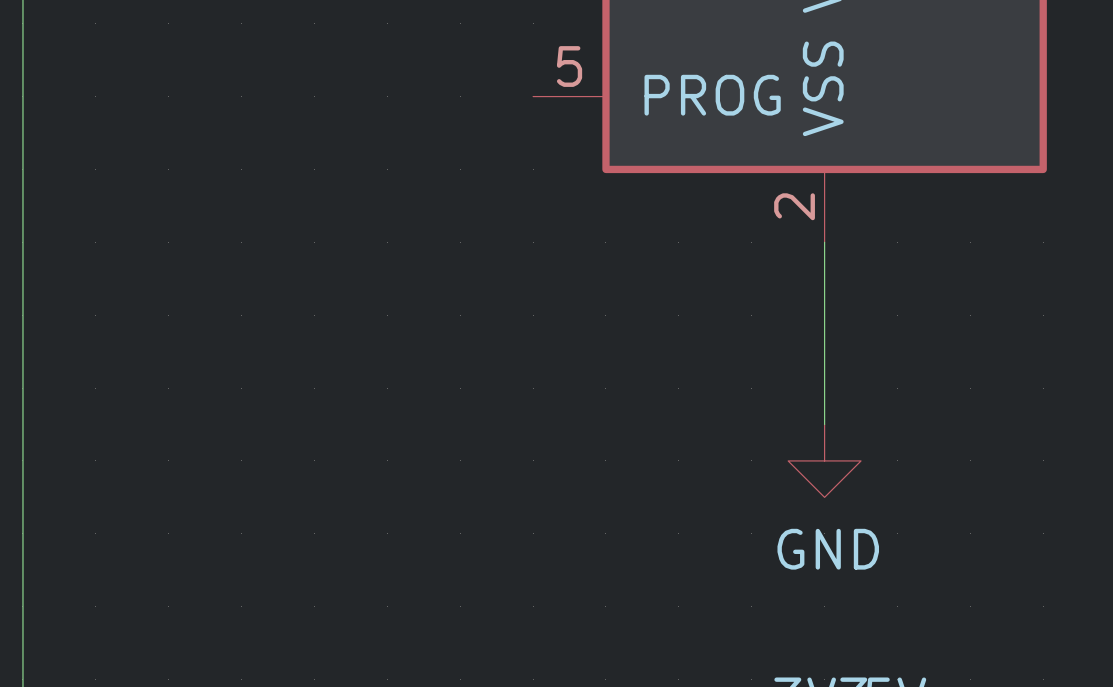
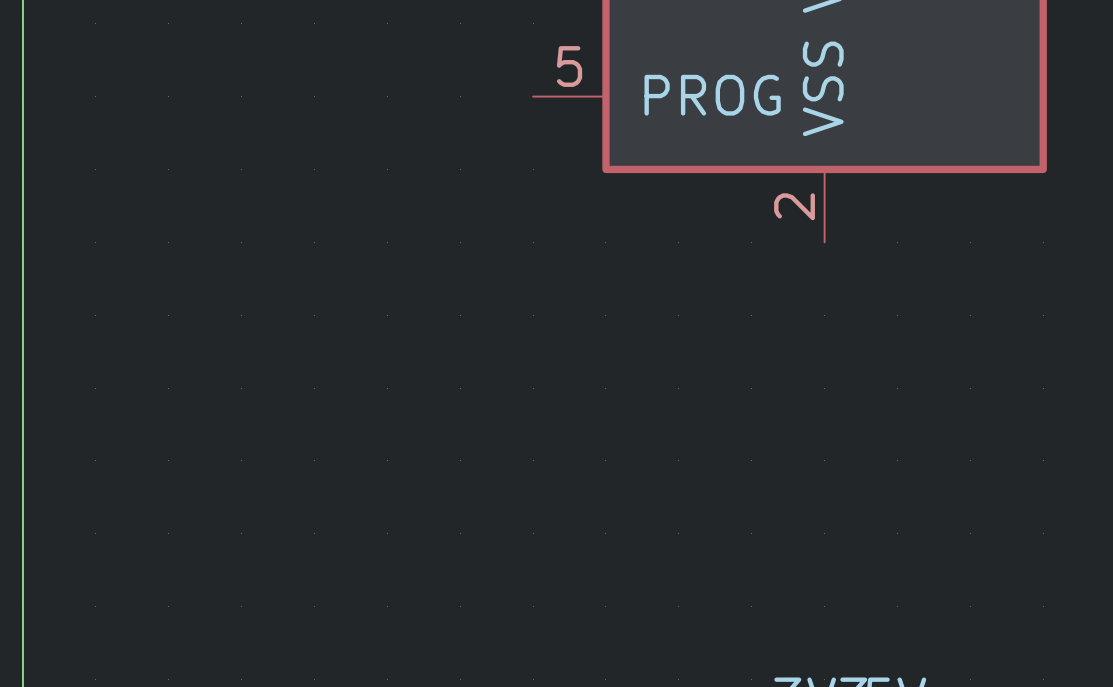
wire: (824, 242) (824, 424) -> none
power symbol: GND (824, 460) -> none

